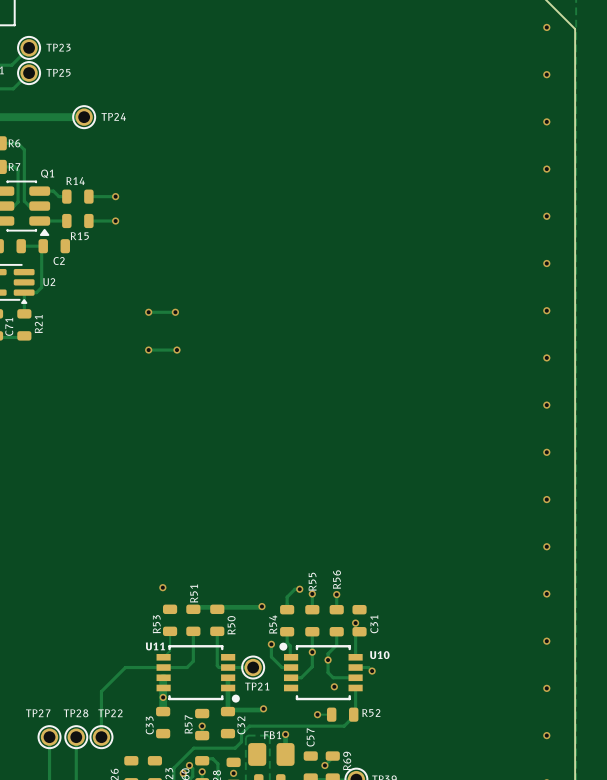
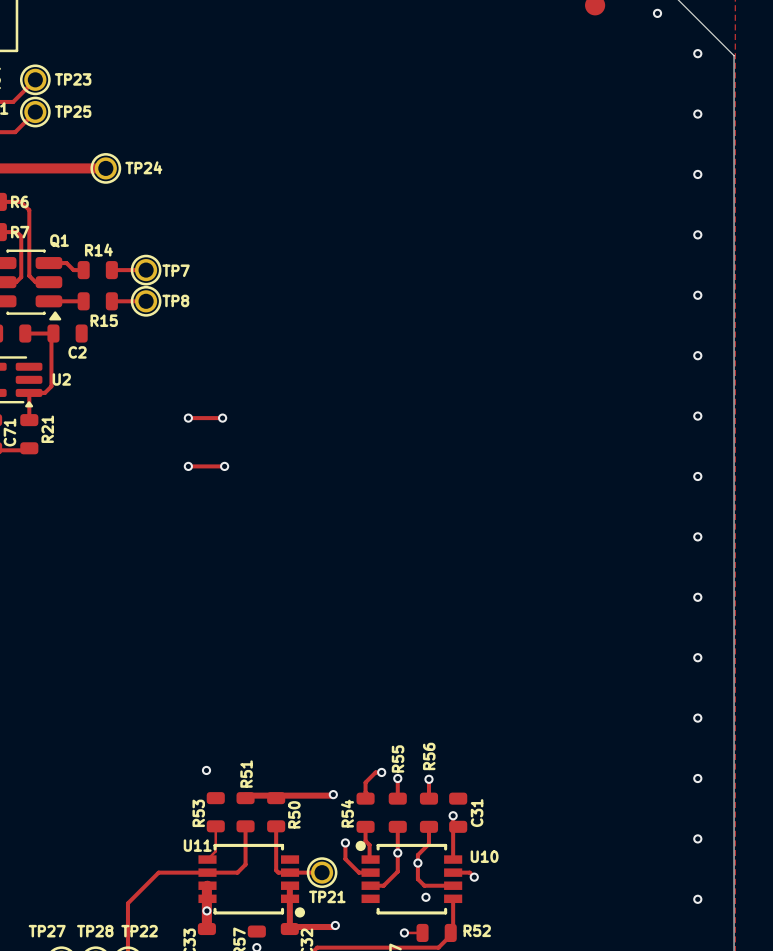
via: (115, 196) -> none
TP7: none -> (146, 270)
via: (115, 221) -> none
TP8: none -> (146, 301)

